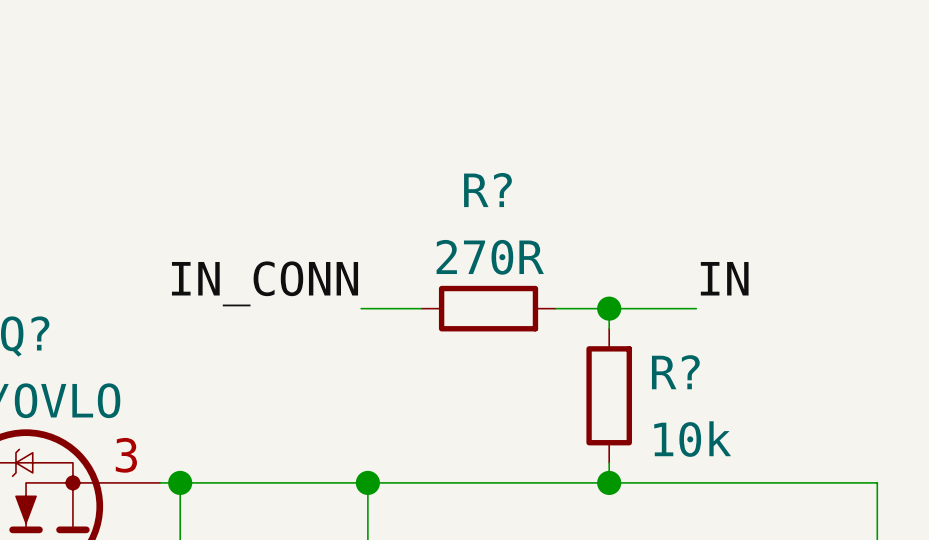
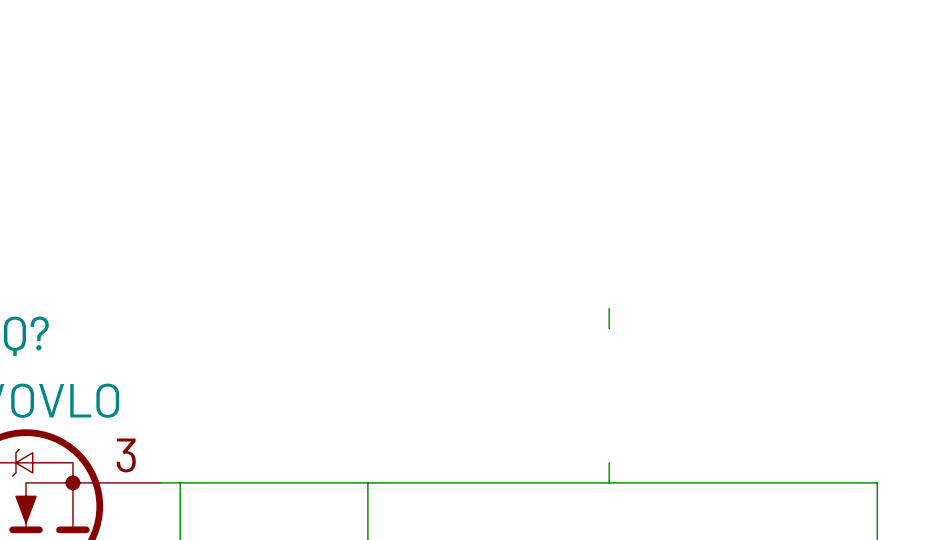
label: IN (724, 278) -> none
label: IN_CONN (265, 283) -> none
wire: (361, 308) (421, 308) -> none
R?: 270R (488, 308) -> none
wire: (555, 308) (696, 308) -> none
junction: (609, 308) -> none
R?: 10k (609, 395) -> none
junction: (180, 482) -> none
junction: (367, 482) -> none
junction: (609, 482) -> none

